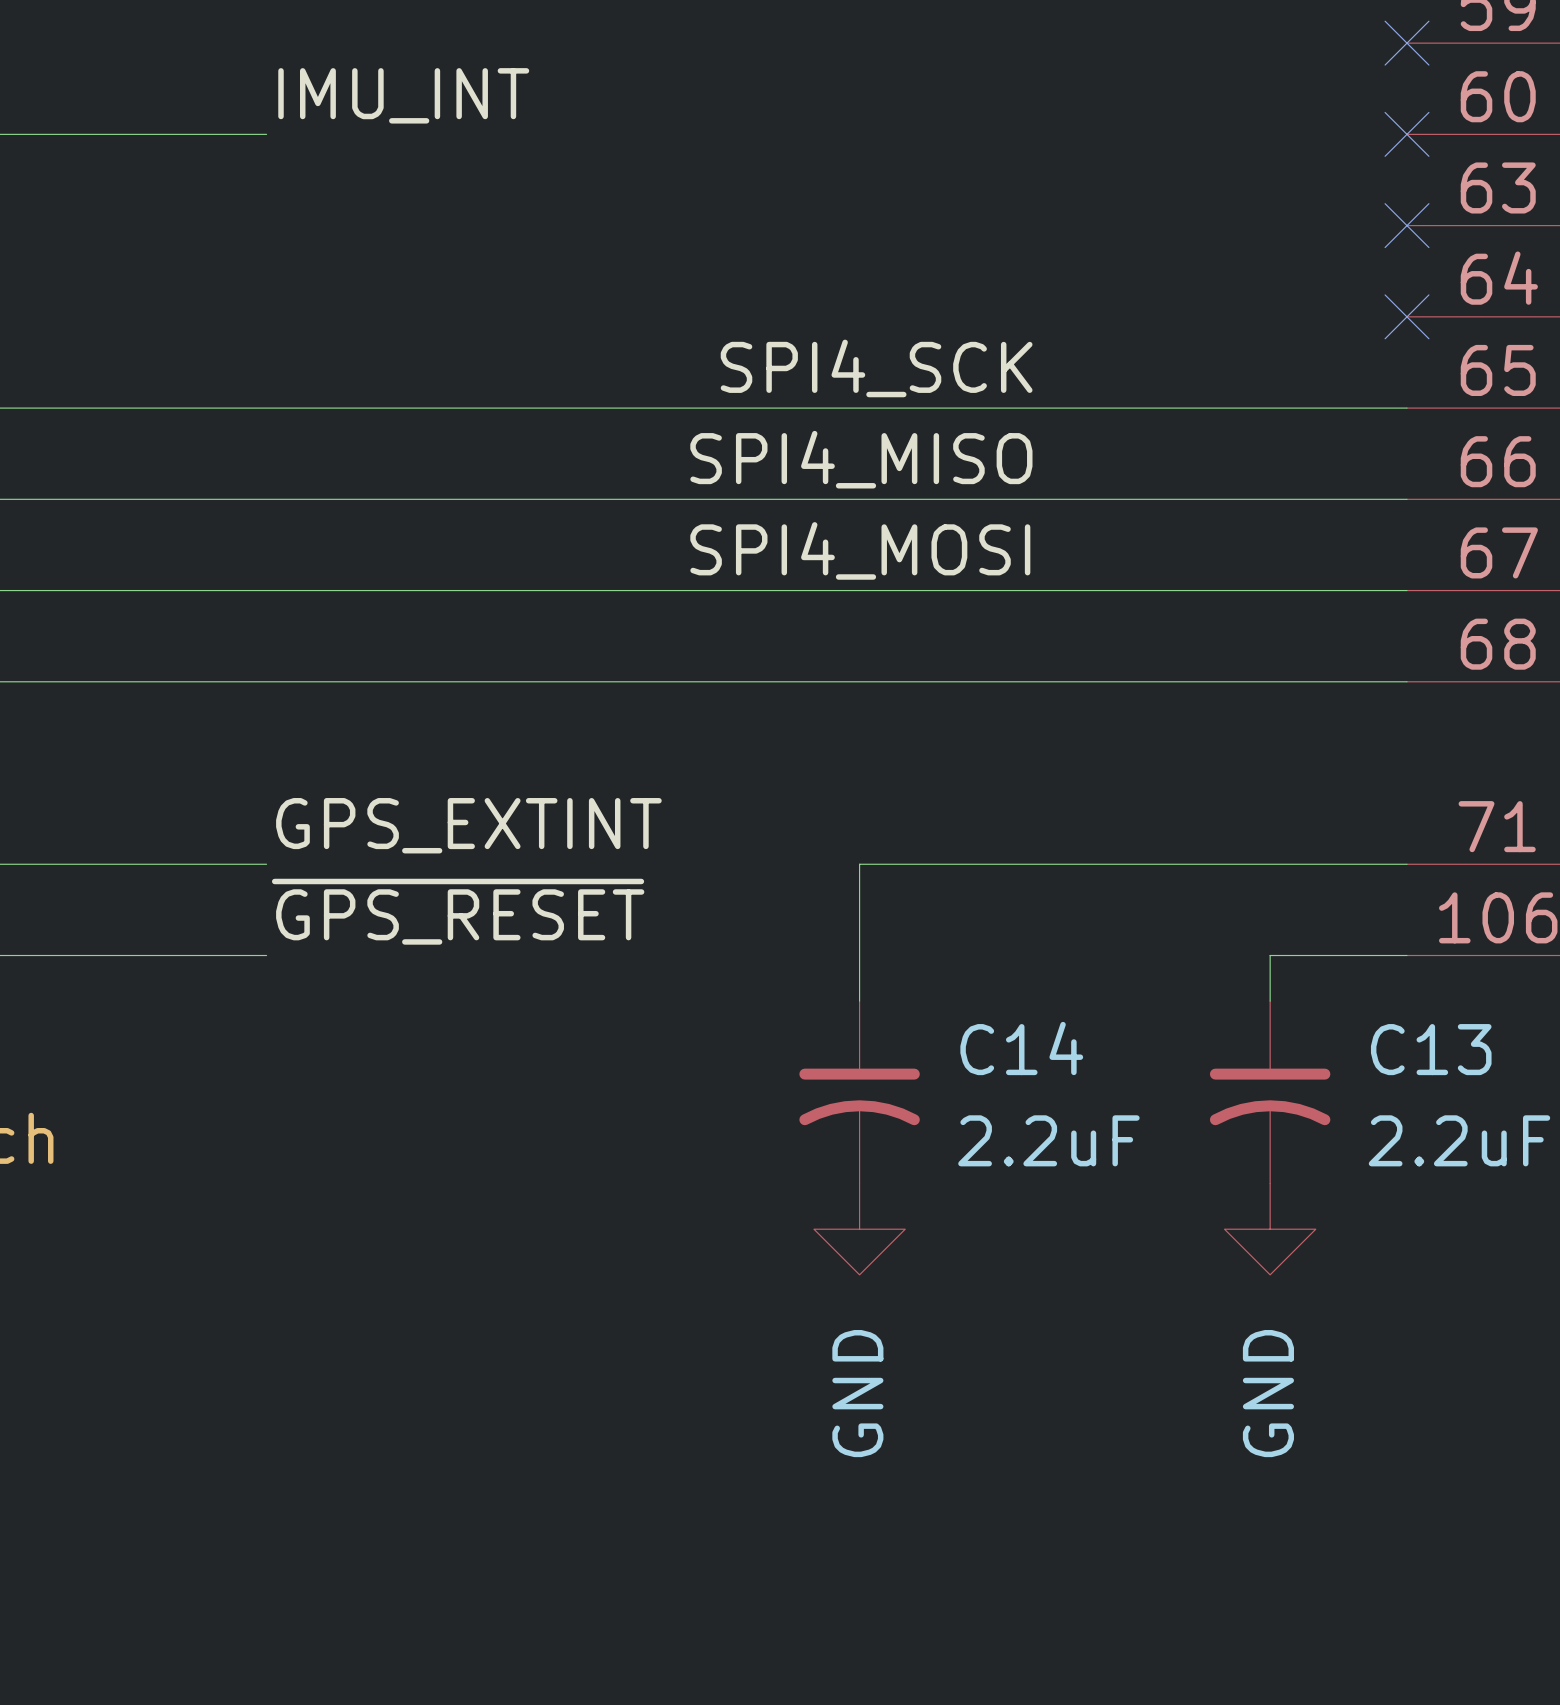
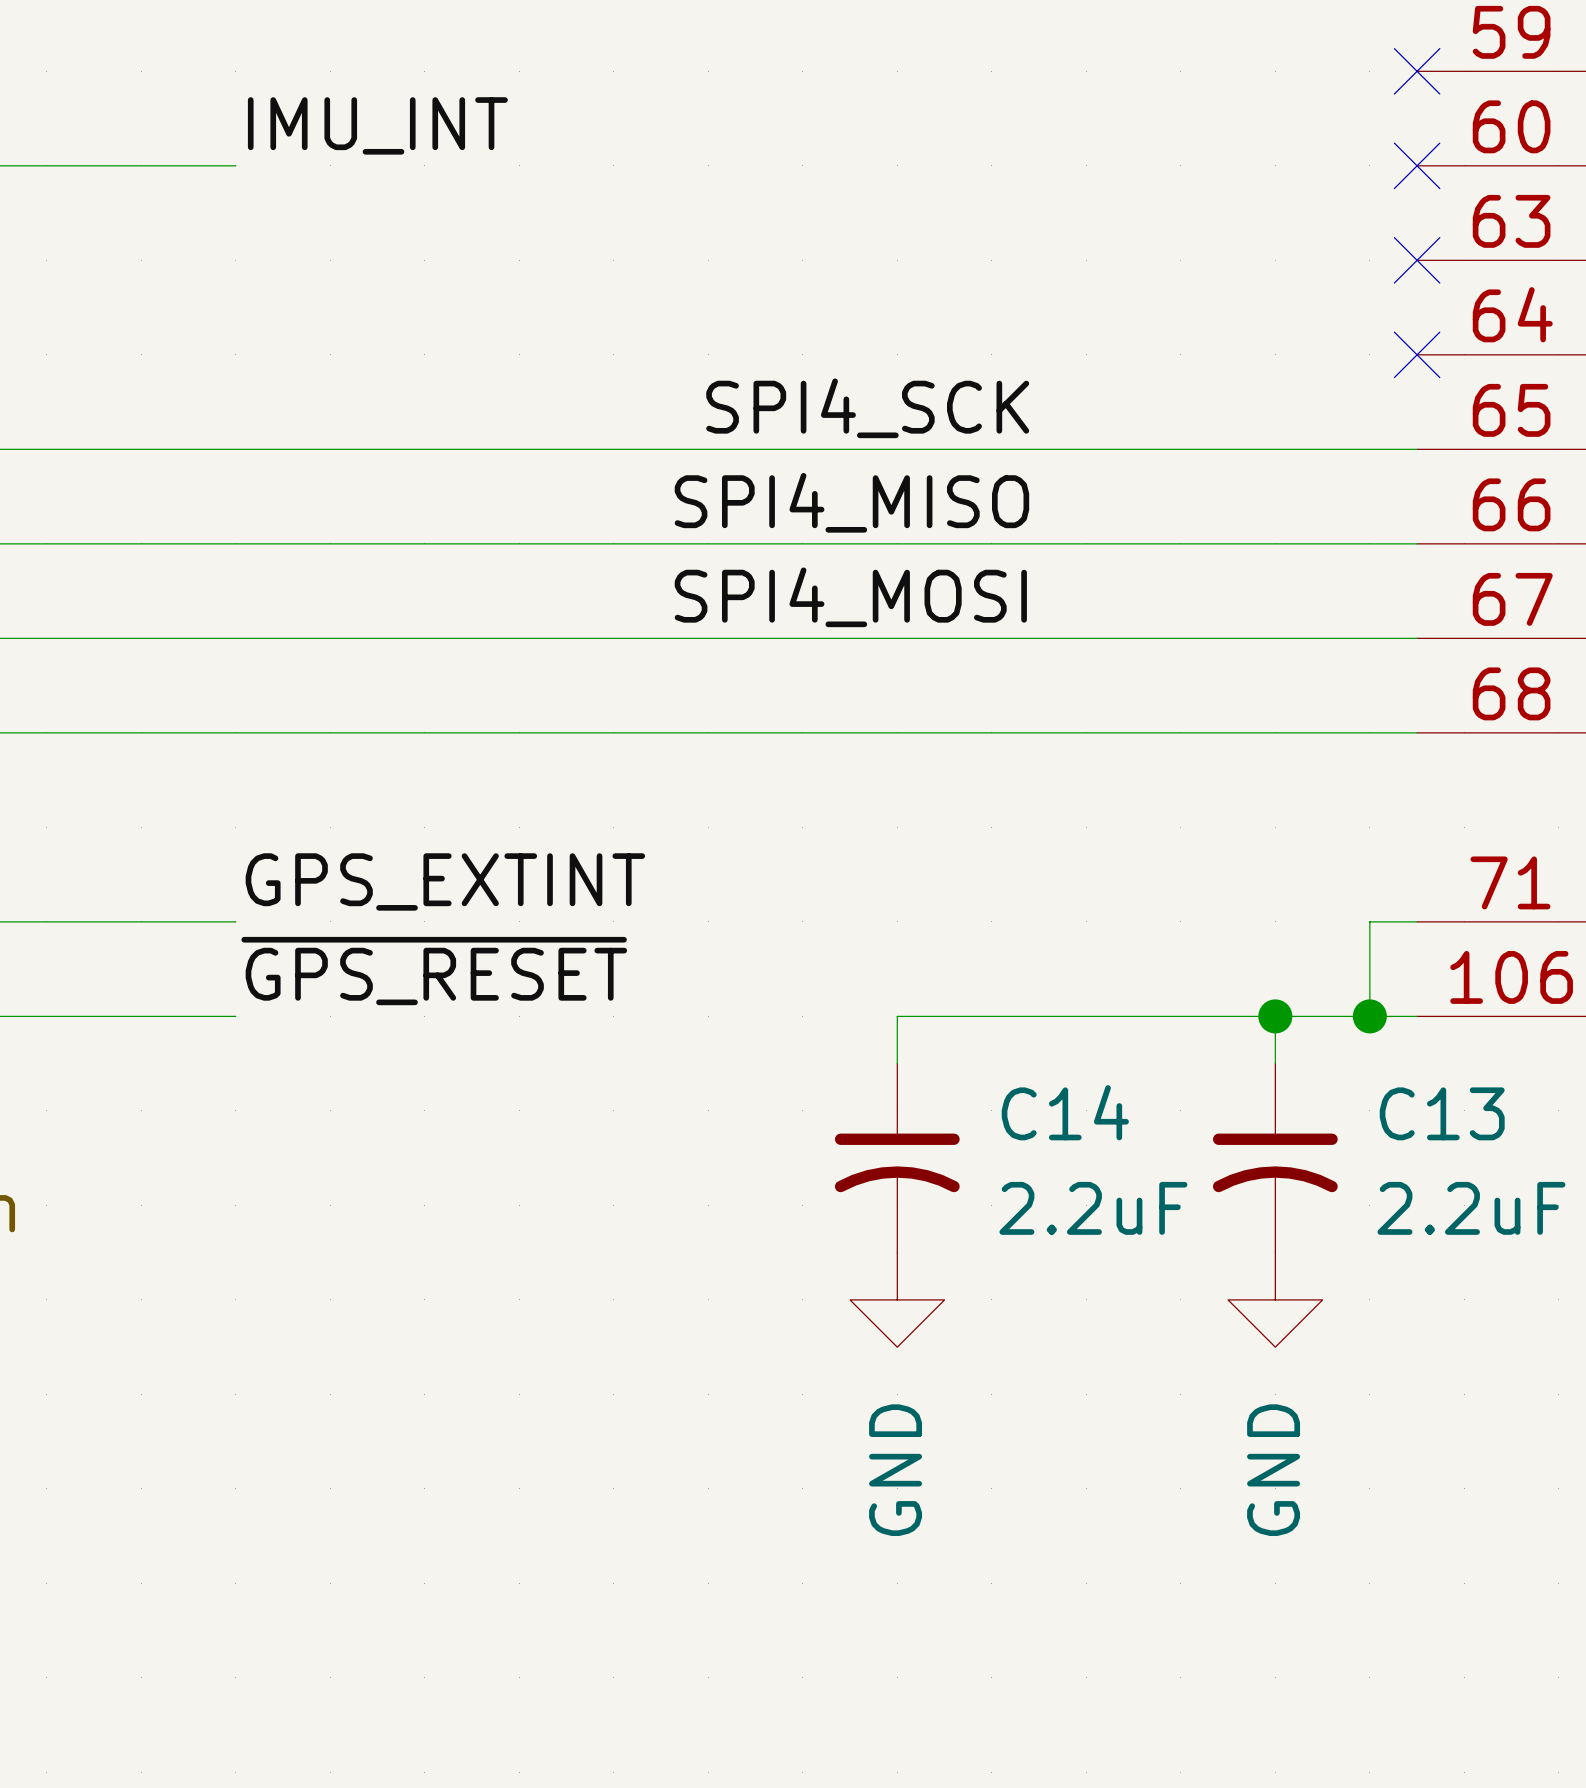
wire: (1361, 864) (859, 864) (859, 1001) -> (1369, 921) (1369, 1016)
wire: none -> (1275, 1016) (897, 1016) (897, 1063)
junction: none -> (1275, 1016)
junction: none -> (1369, 1016)
C14 position: (859, 1092) -> (897, 1158)
power symbol position: GND (859, 1229) -> GND (897, 1299)

